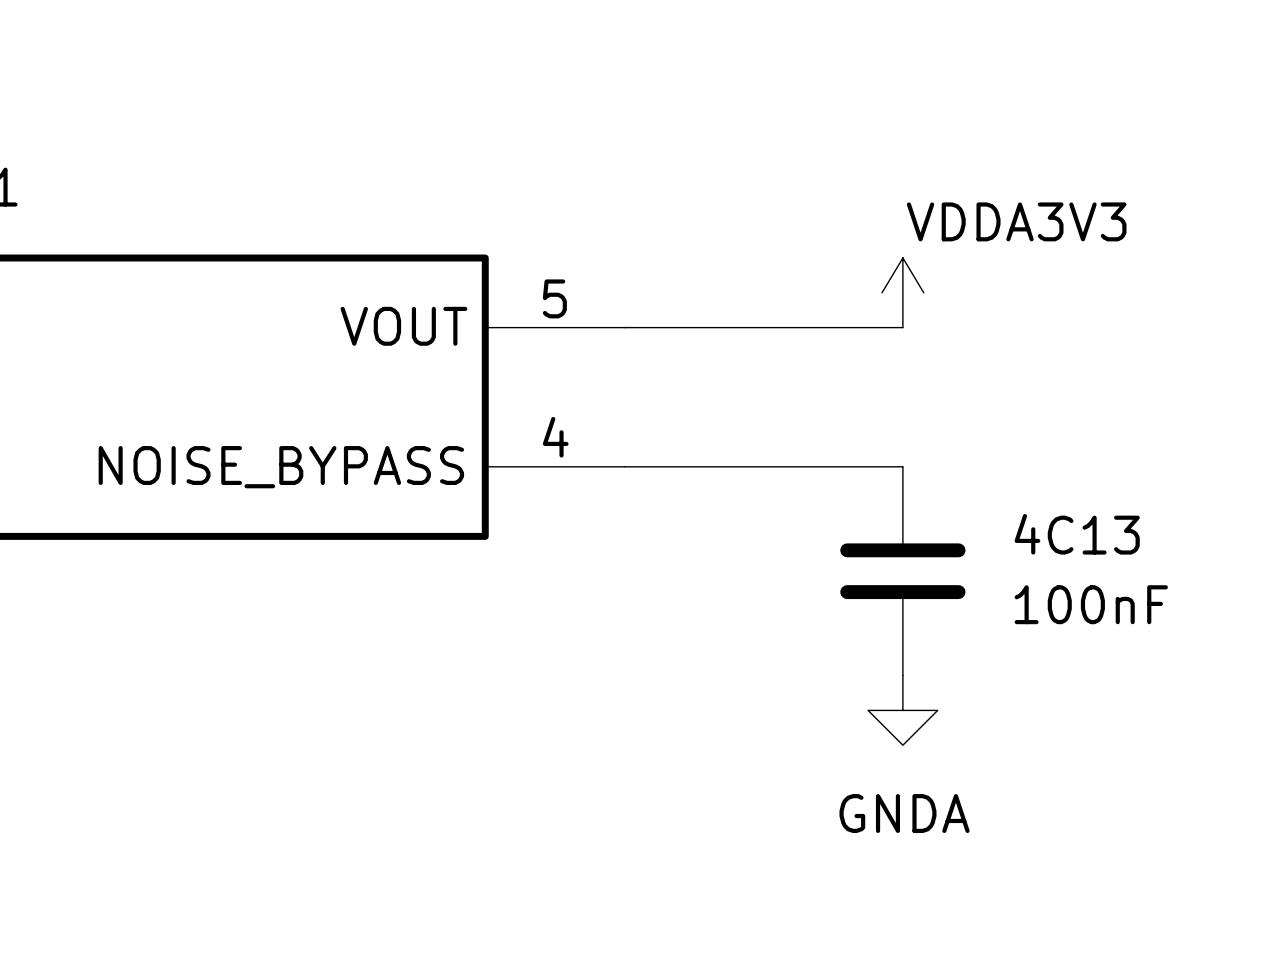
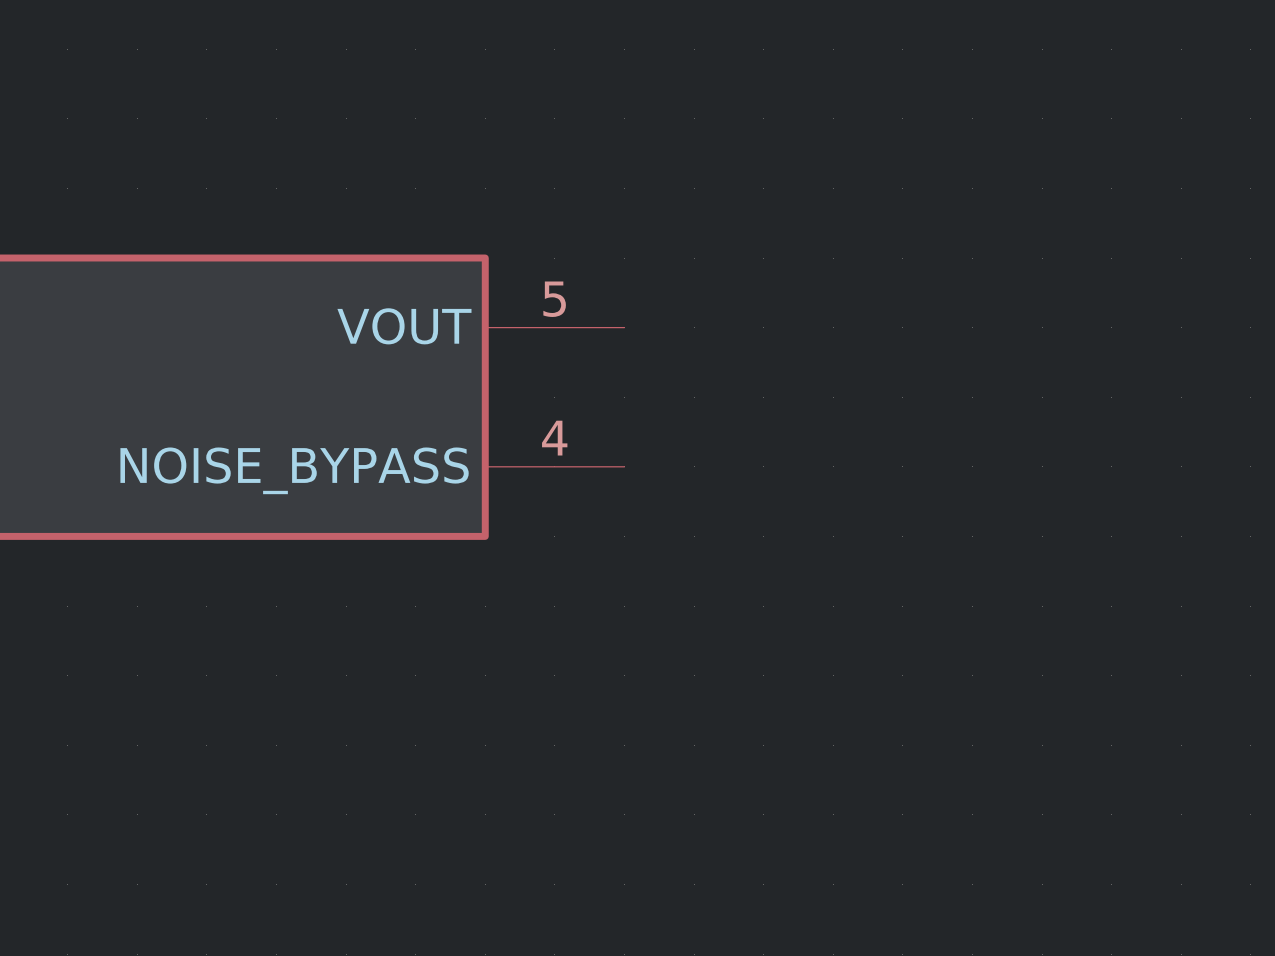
power symbol: VDDA3V3 (902, 292) -> none
wire: (624, 327) (902, 327) -> none
wire: (624, 466) (902, 466) -> none
4C13: 100nF (902, 571) -> none
power symbol: GNDA (902, 710) -> none

